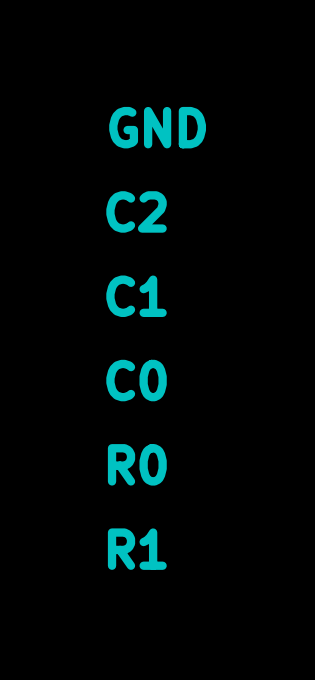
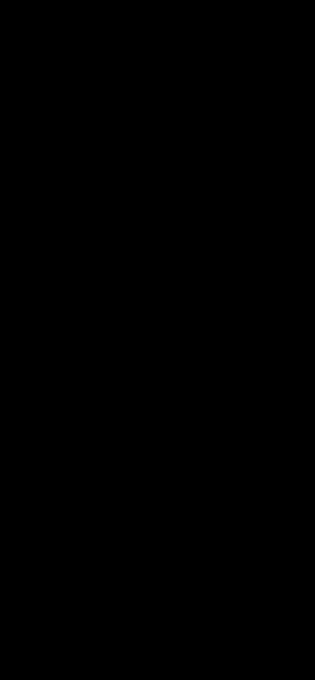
text: GND (157, 127) -> none
text: C2 (136, 211) -> none
text: C1 (136, 296) -> none
text: C0 (136, 380) -> none
text: R0 (137, 464) -> none
text: R1 (137, 549) -> none

